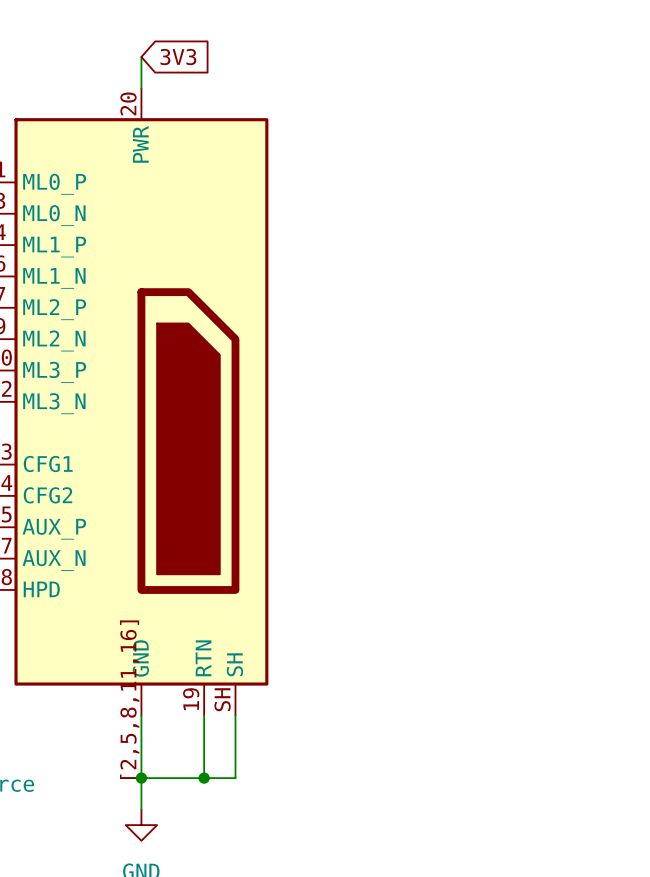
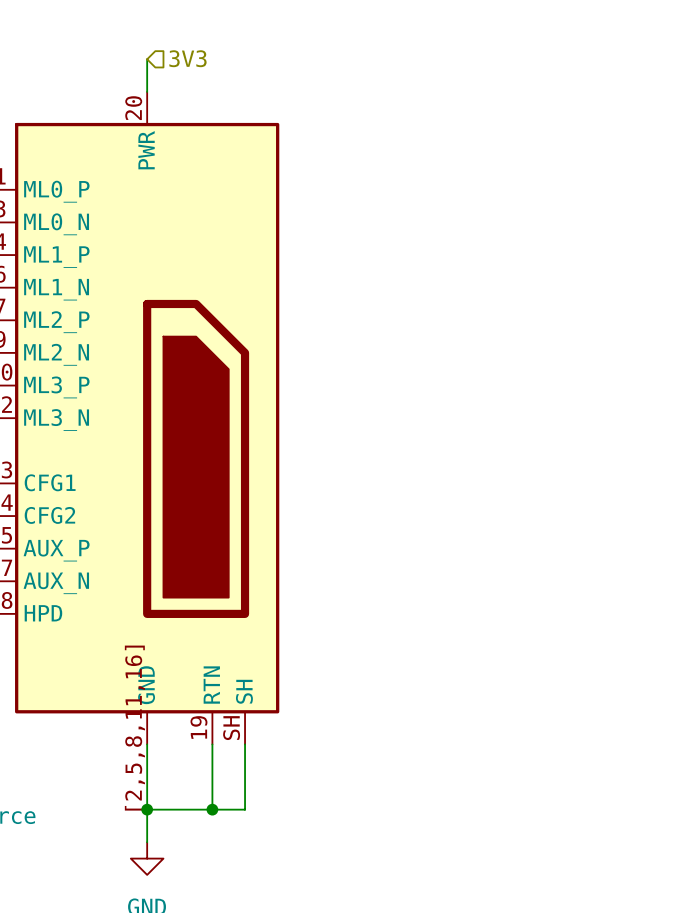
hierarchical label: none -> 3V3 (187, 58)
global label: 3V3 (178, 57) -> none

